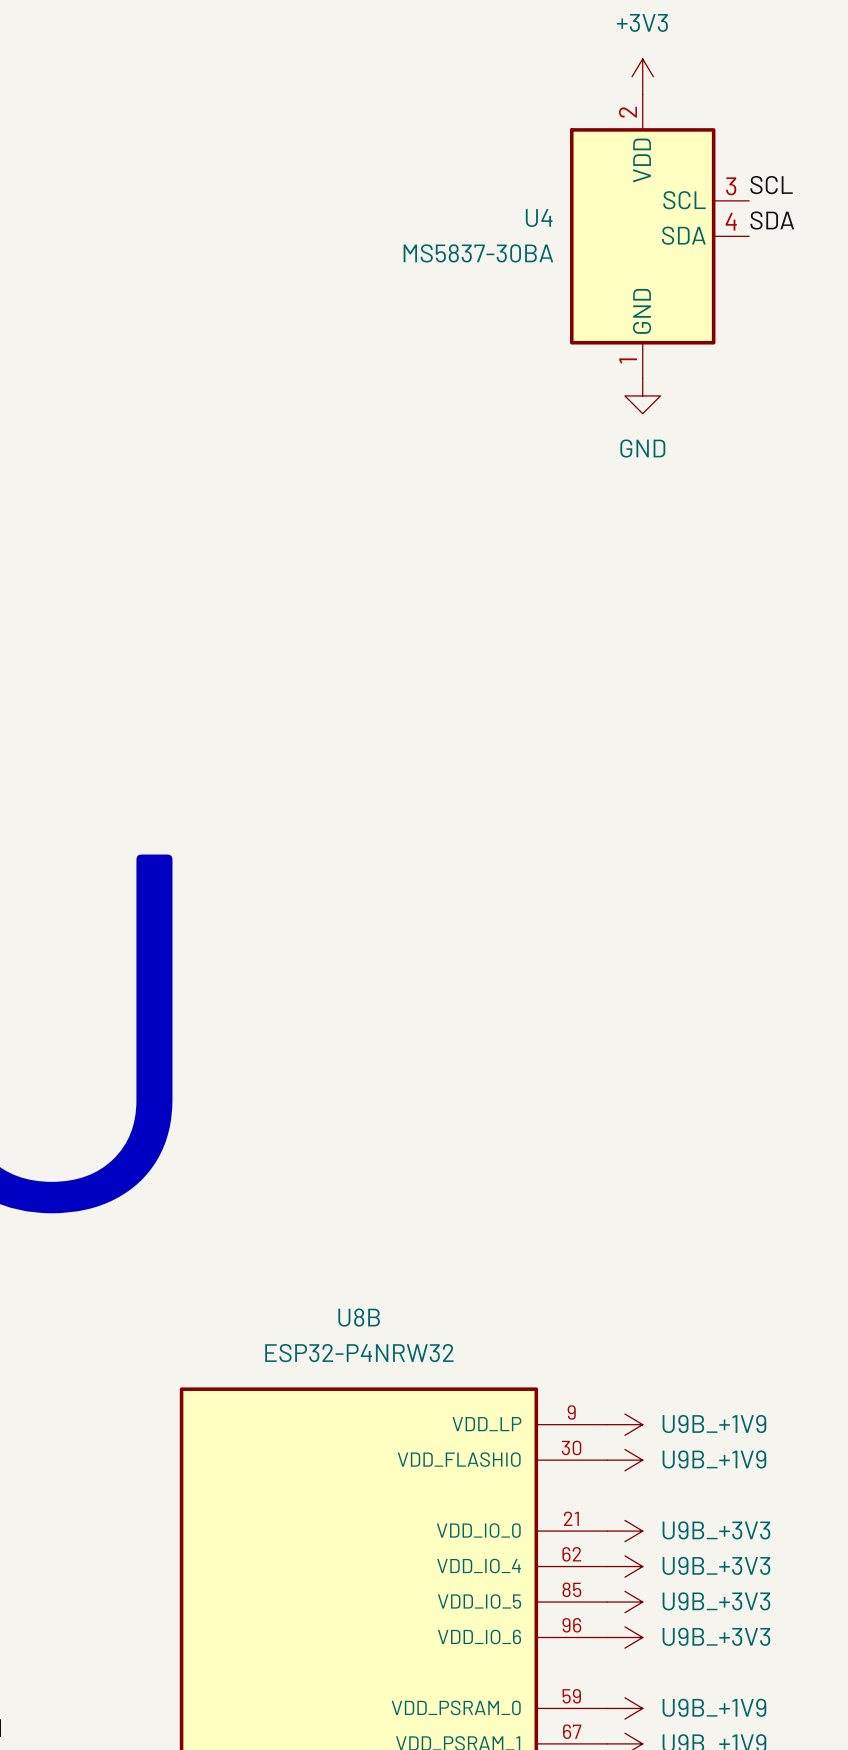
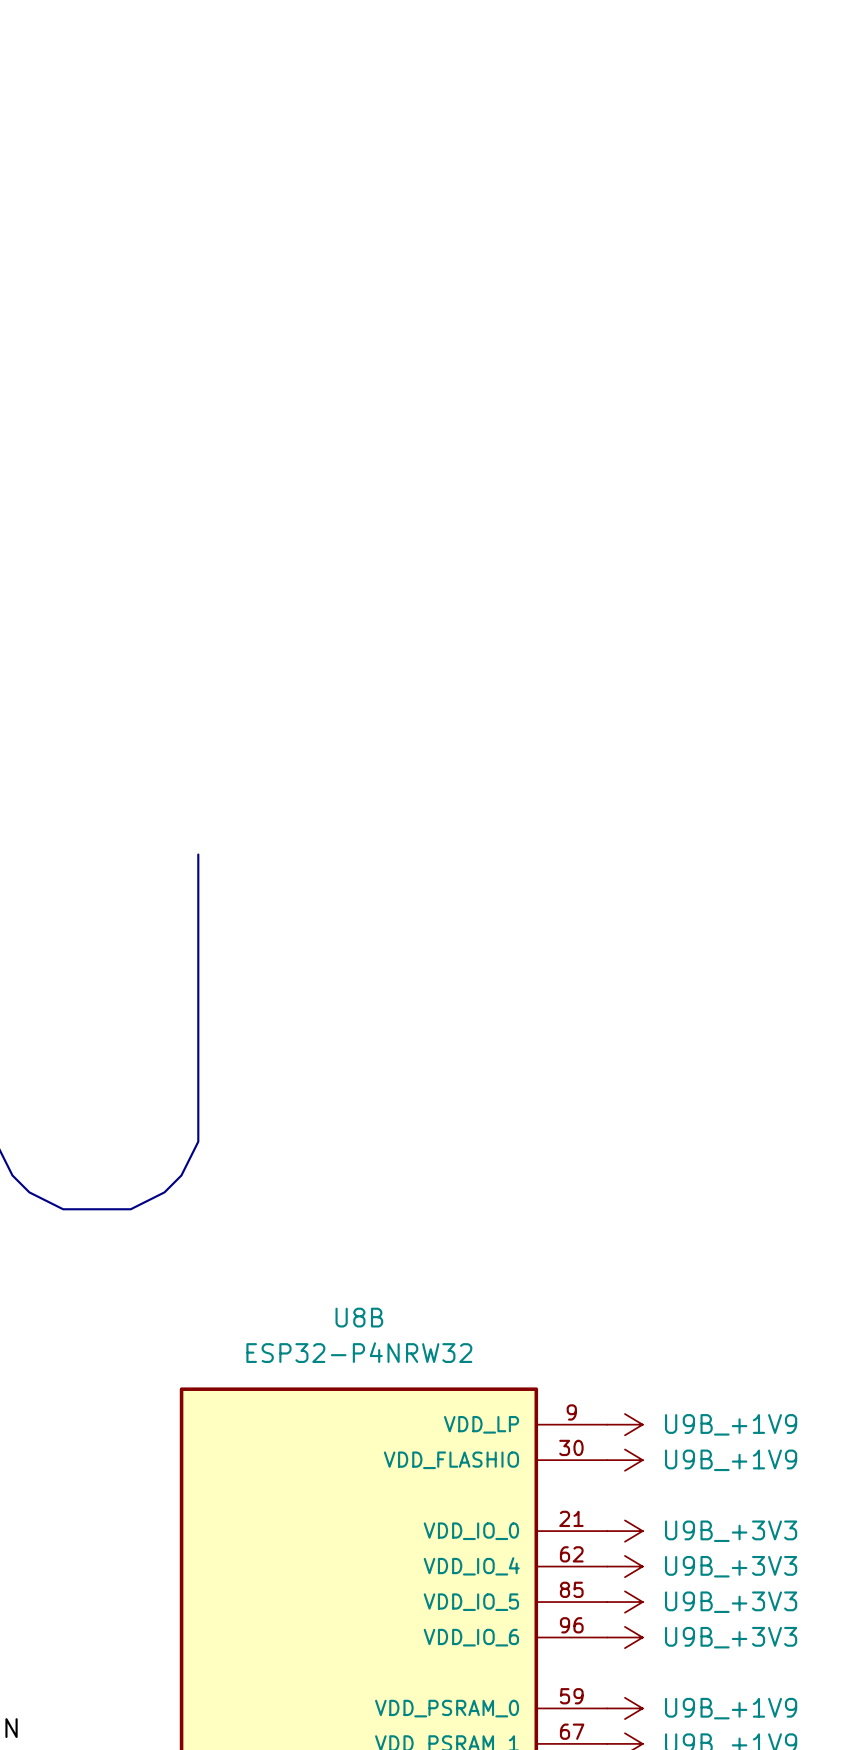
power symbol: +3V3 (642, 76) -> none
label: SCL (771, 185) -> none
label: SDA (772, 220) -> none
U4: MS5837-30BA (659, 236) -> none
power symbol: GND (642, 395) -> none

